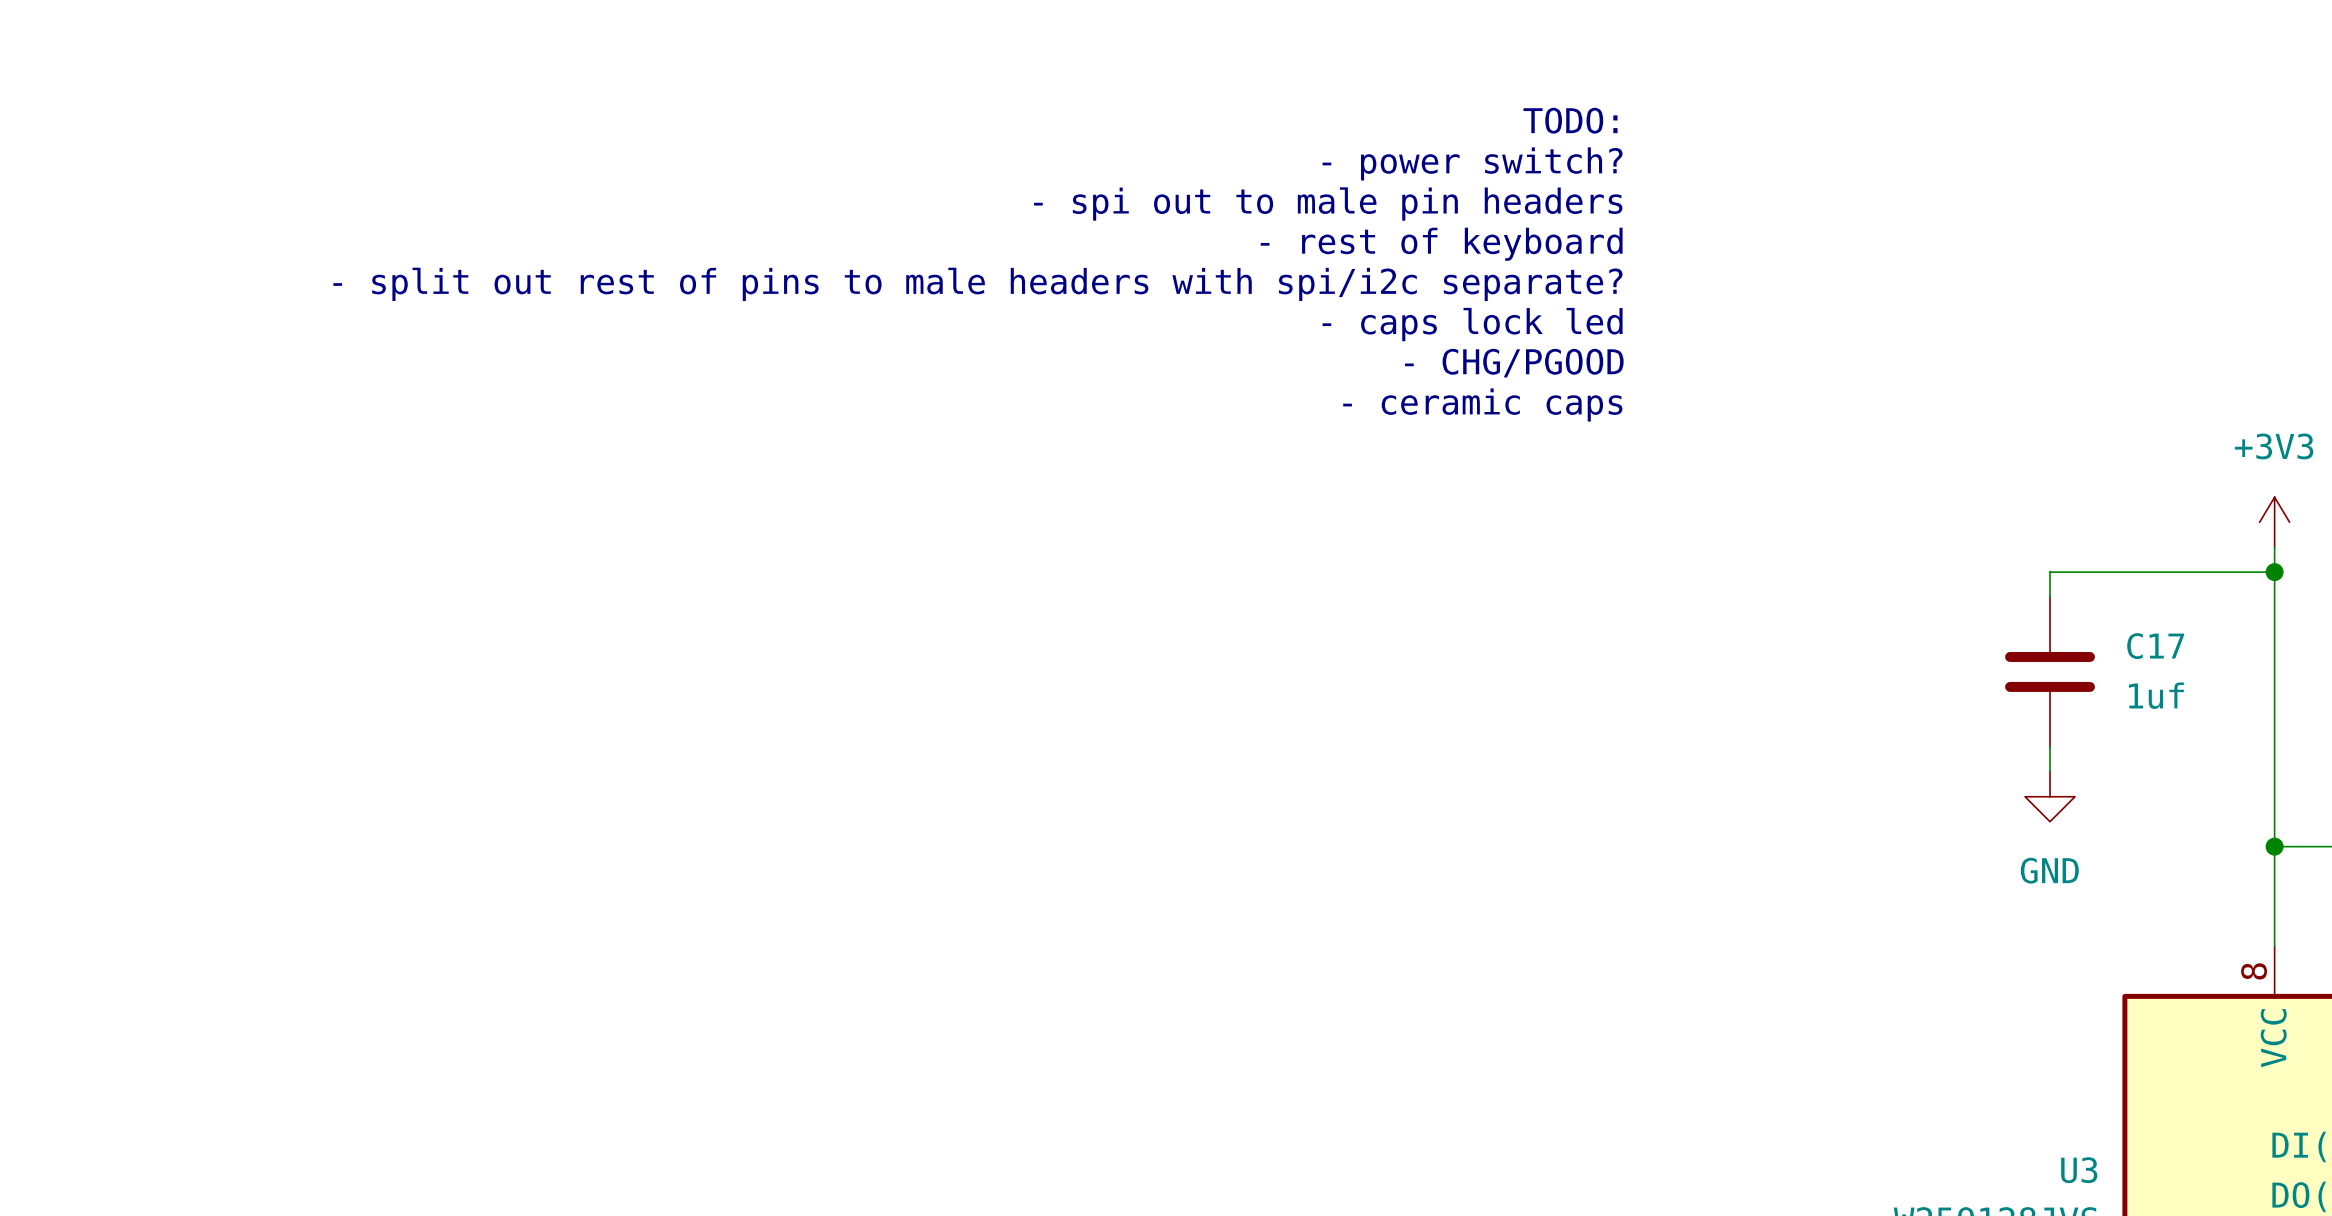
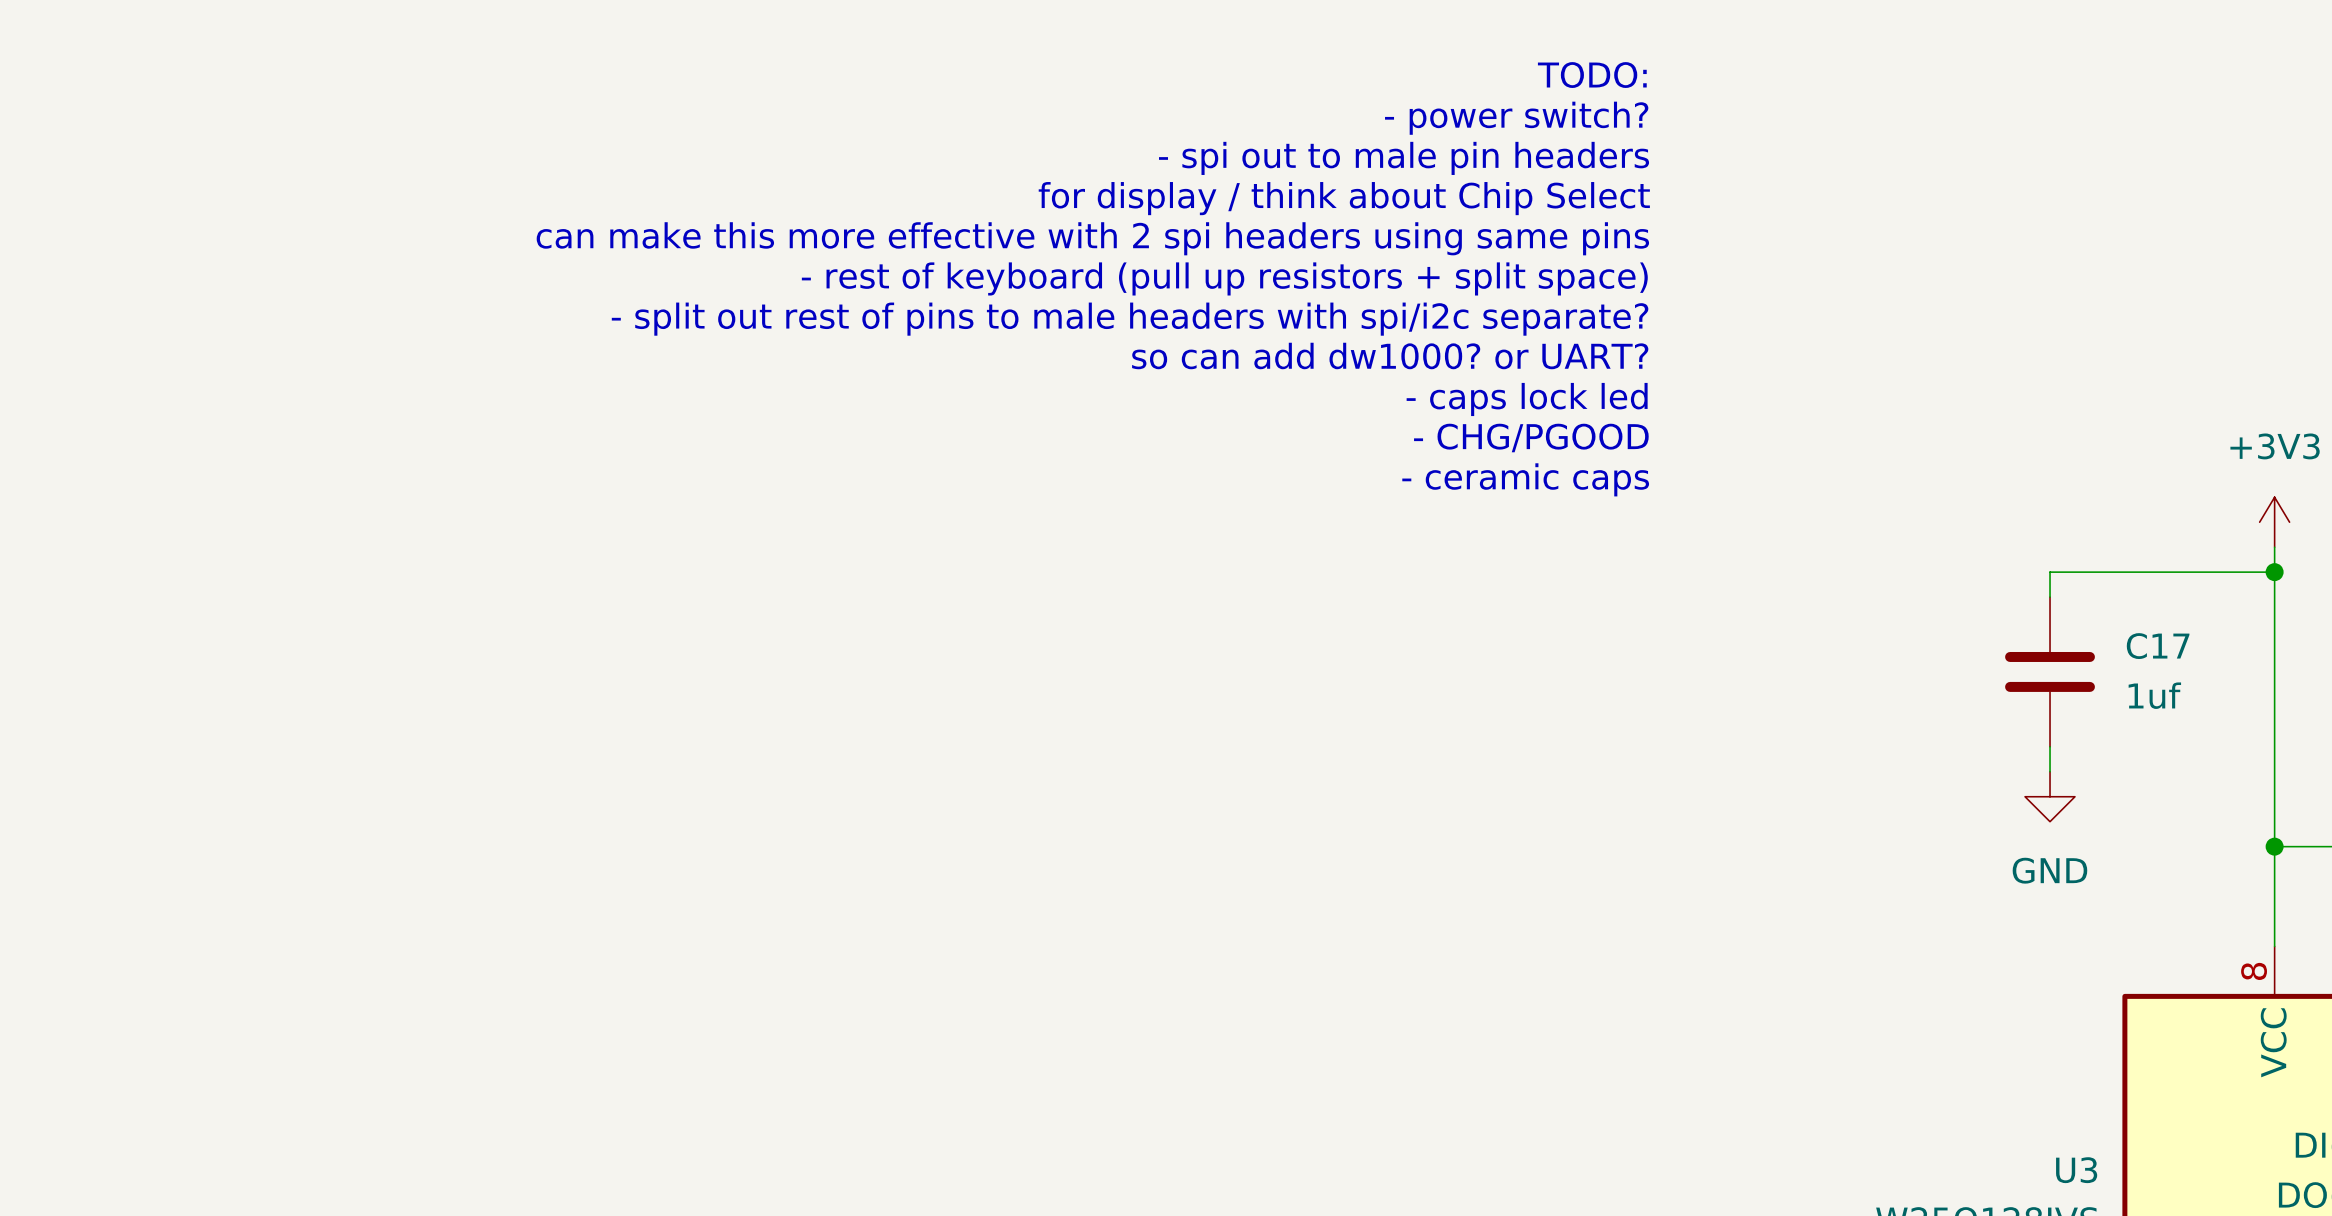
text position: TODO: (1570, 120) -> TODO: (1592, 75)
text position: - power switch? (1472, 163) -> - power switch? (1516, 118)
text: none -> for display / think about Chip Select (1344, 198)
text position: - spi out to male pin headers (1328, 203) -> - spi out to male pin headers (1404, 158)
text: none -> can make this more effective with 2 spi headers using same pins (1092, 238)
text: - rest of keyboard (1441, 244) -> none
text: none -> - rest of keyboard (pull up resistors + split space) (1224, 278)
text position: - split out rest of pins to male headers with spi/i2c separate? (977, 284) -> - split out rest of pins to male headers with spi/i2c separate? (1130, 319)
text position: - caps lock led (1472, 324) -> - caps lock led (1527, 399)
text: none -> so can add dw1000? or UART? (1390, 355)
text position: - CHG/PGOOD (1514, 363) -> - CHG/PGOOD (1531, 438)
text position: - ceramic caps (1482, 404) -> - ceramic caps (1525, 479)

